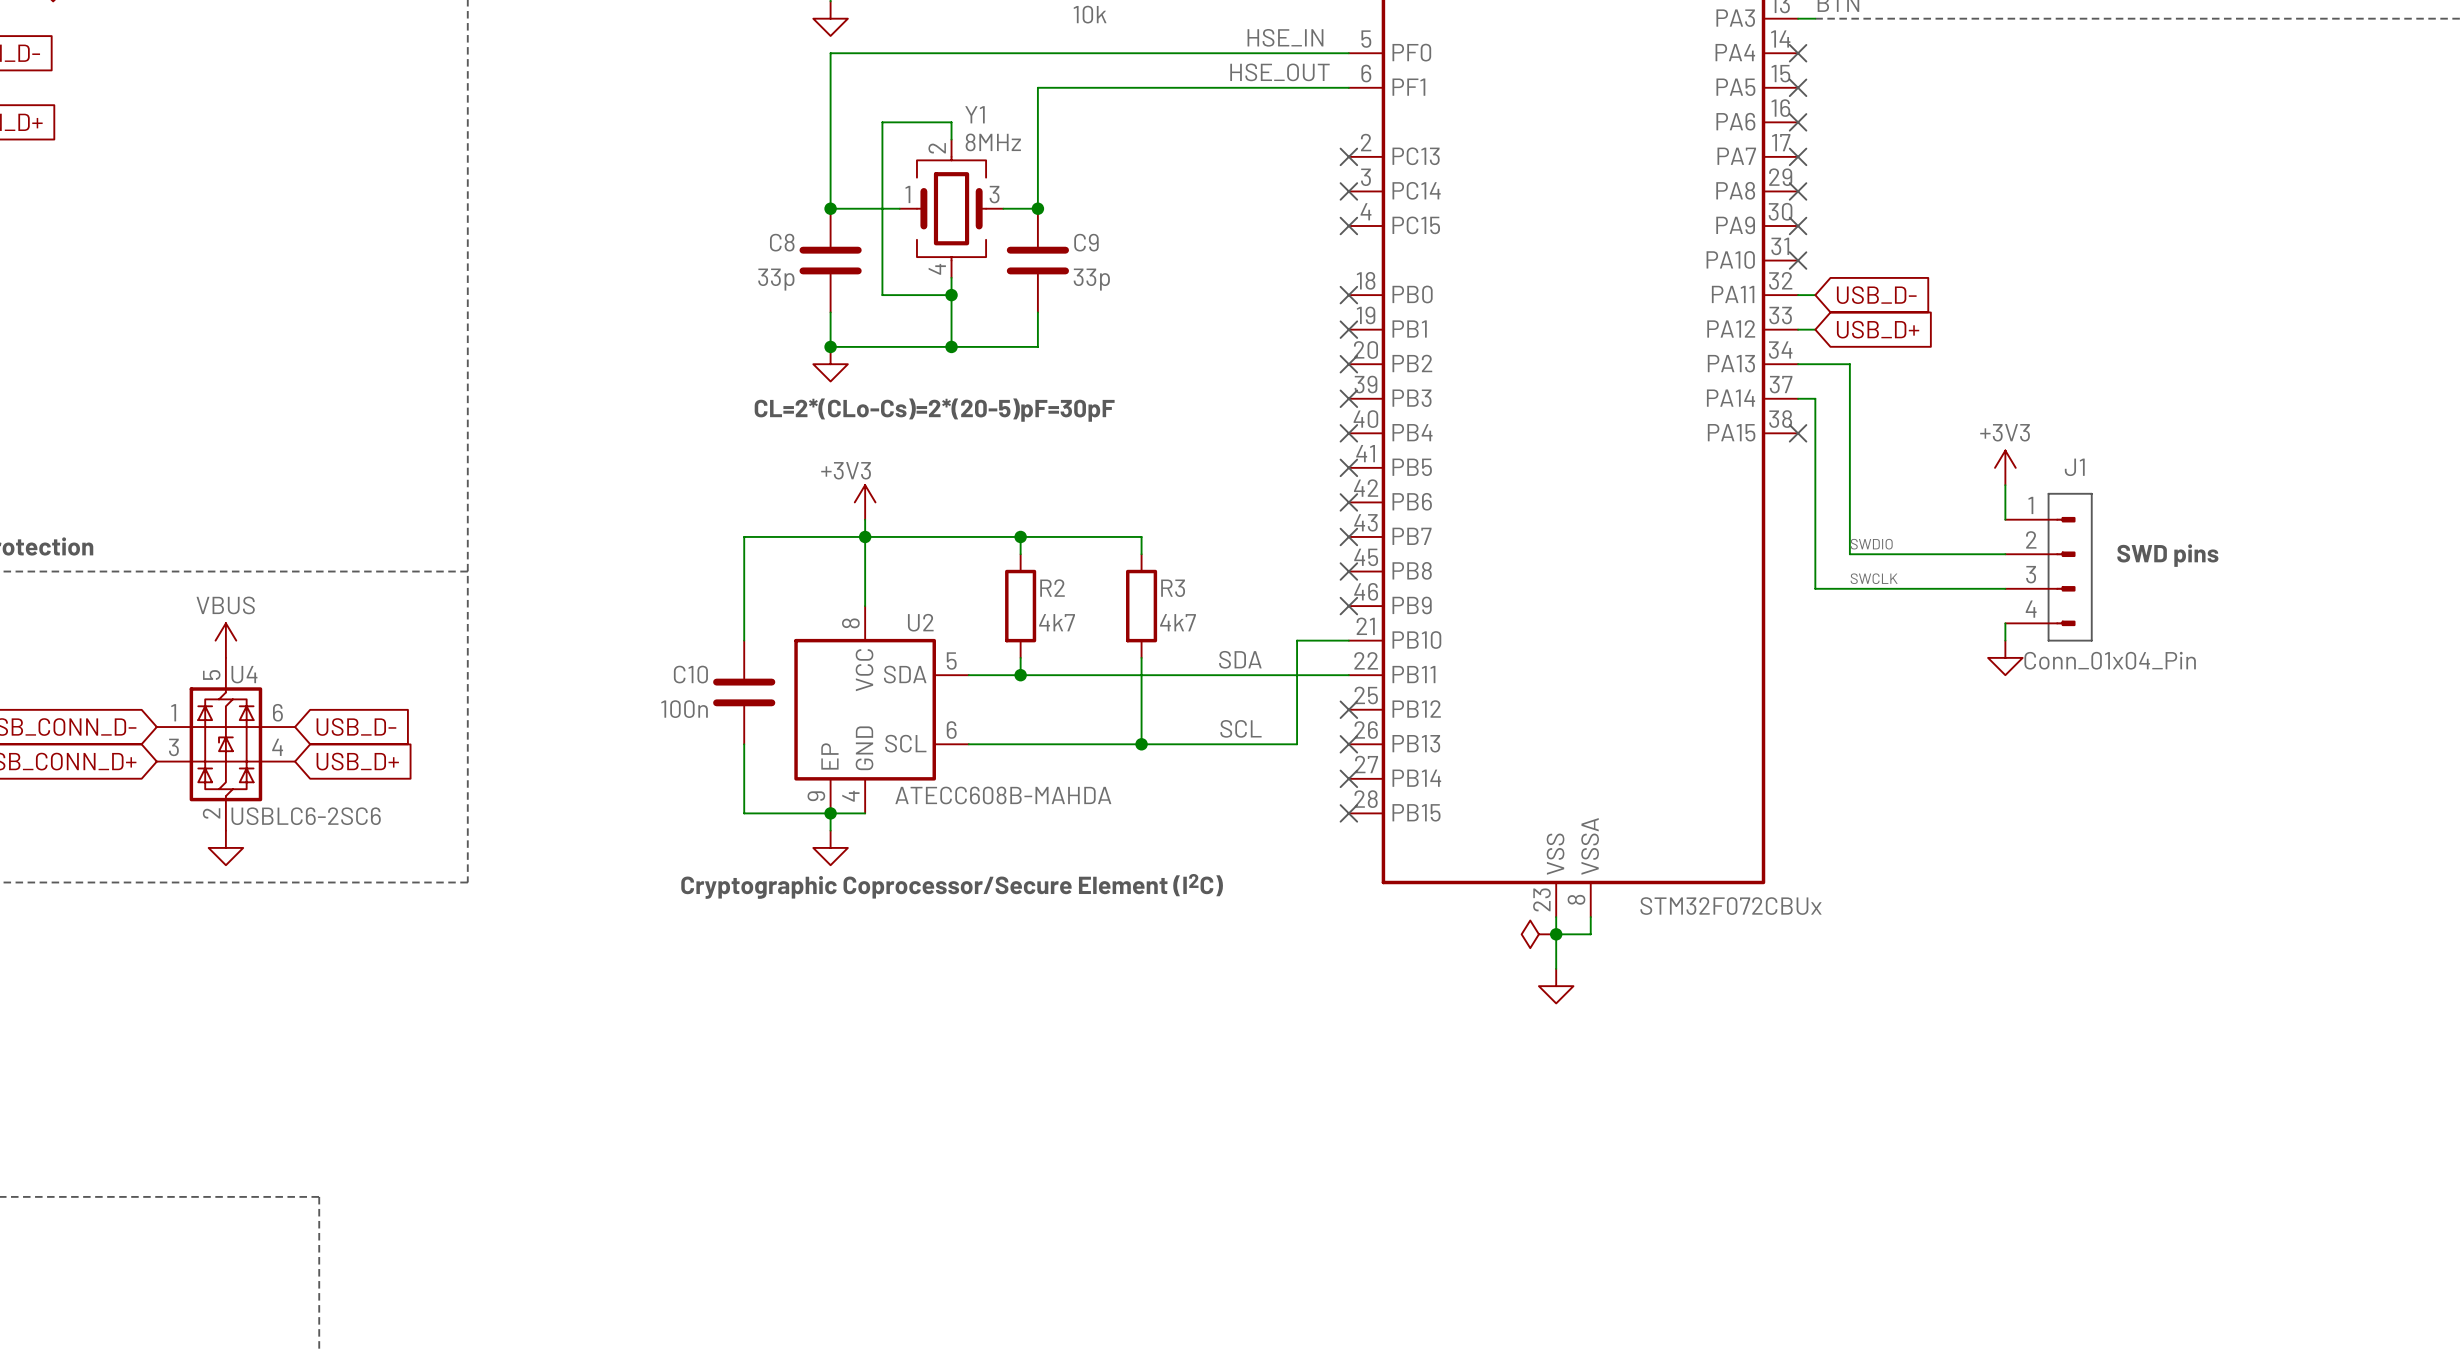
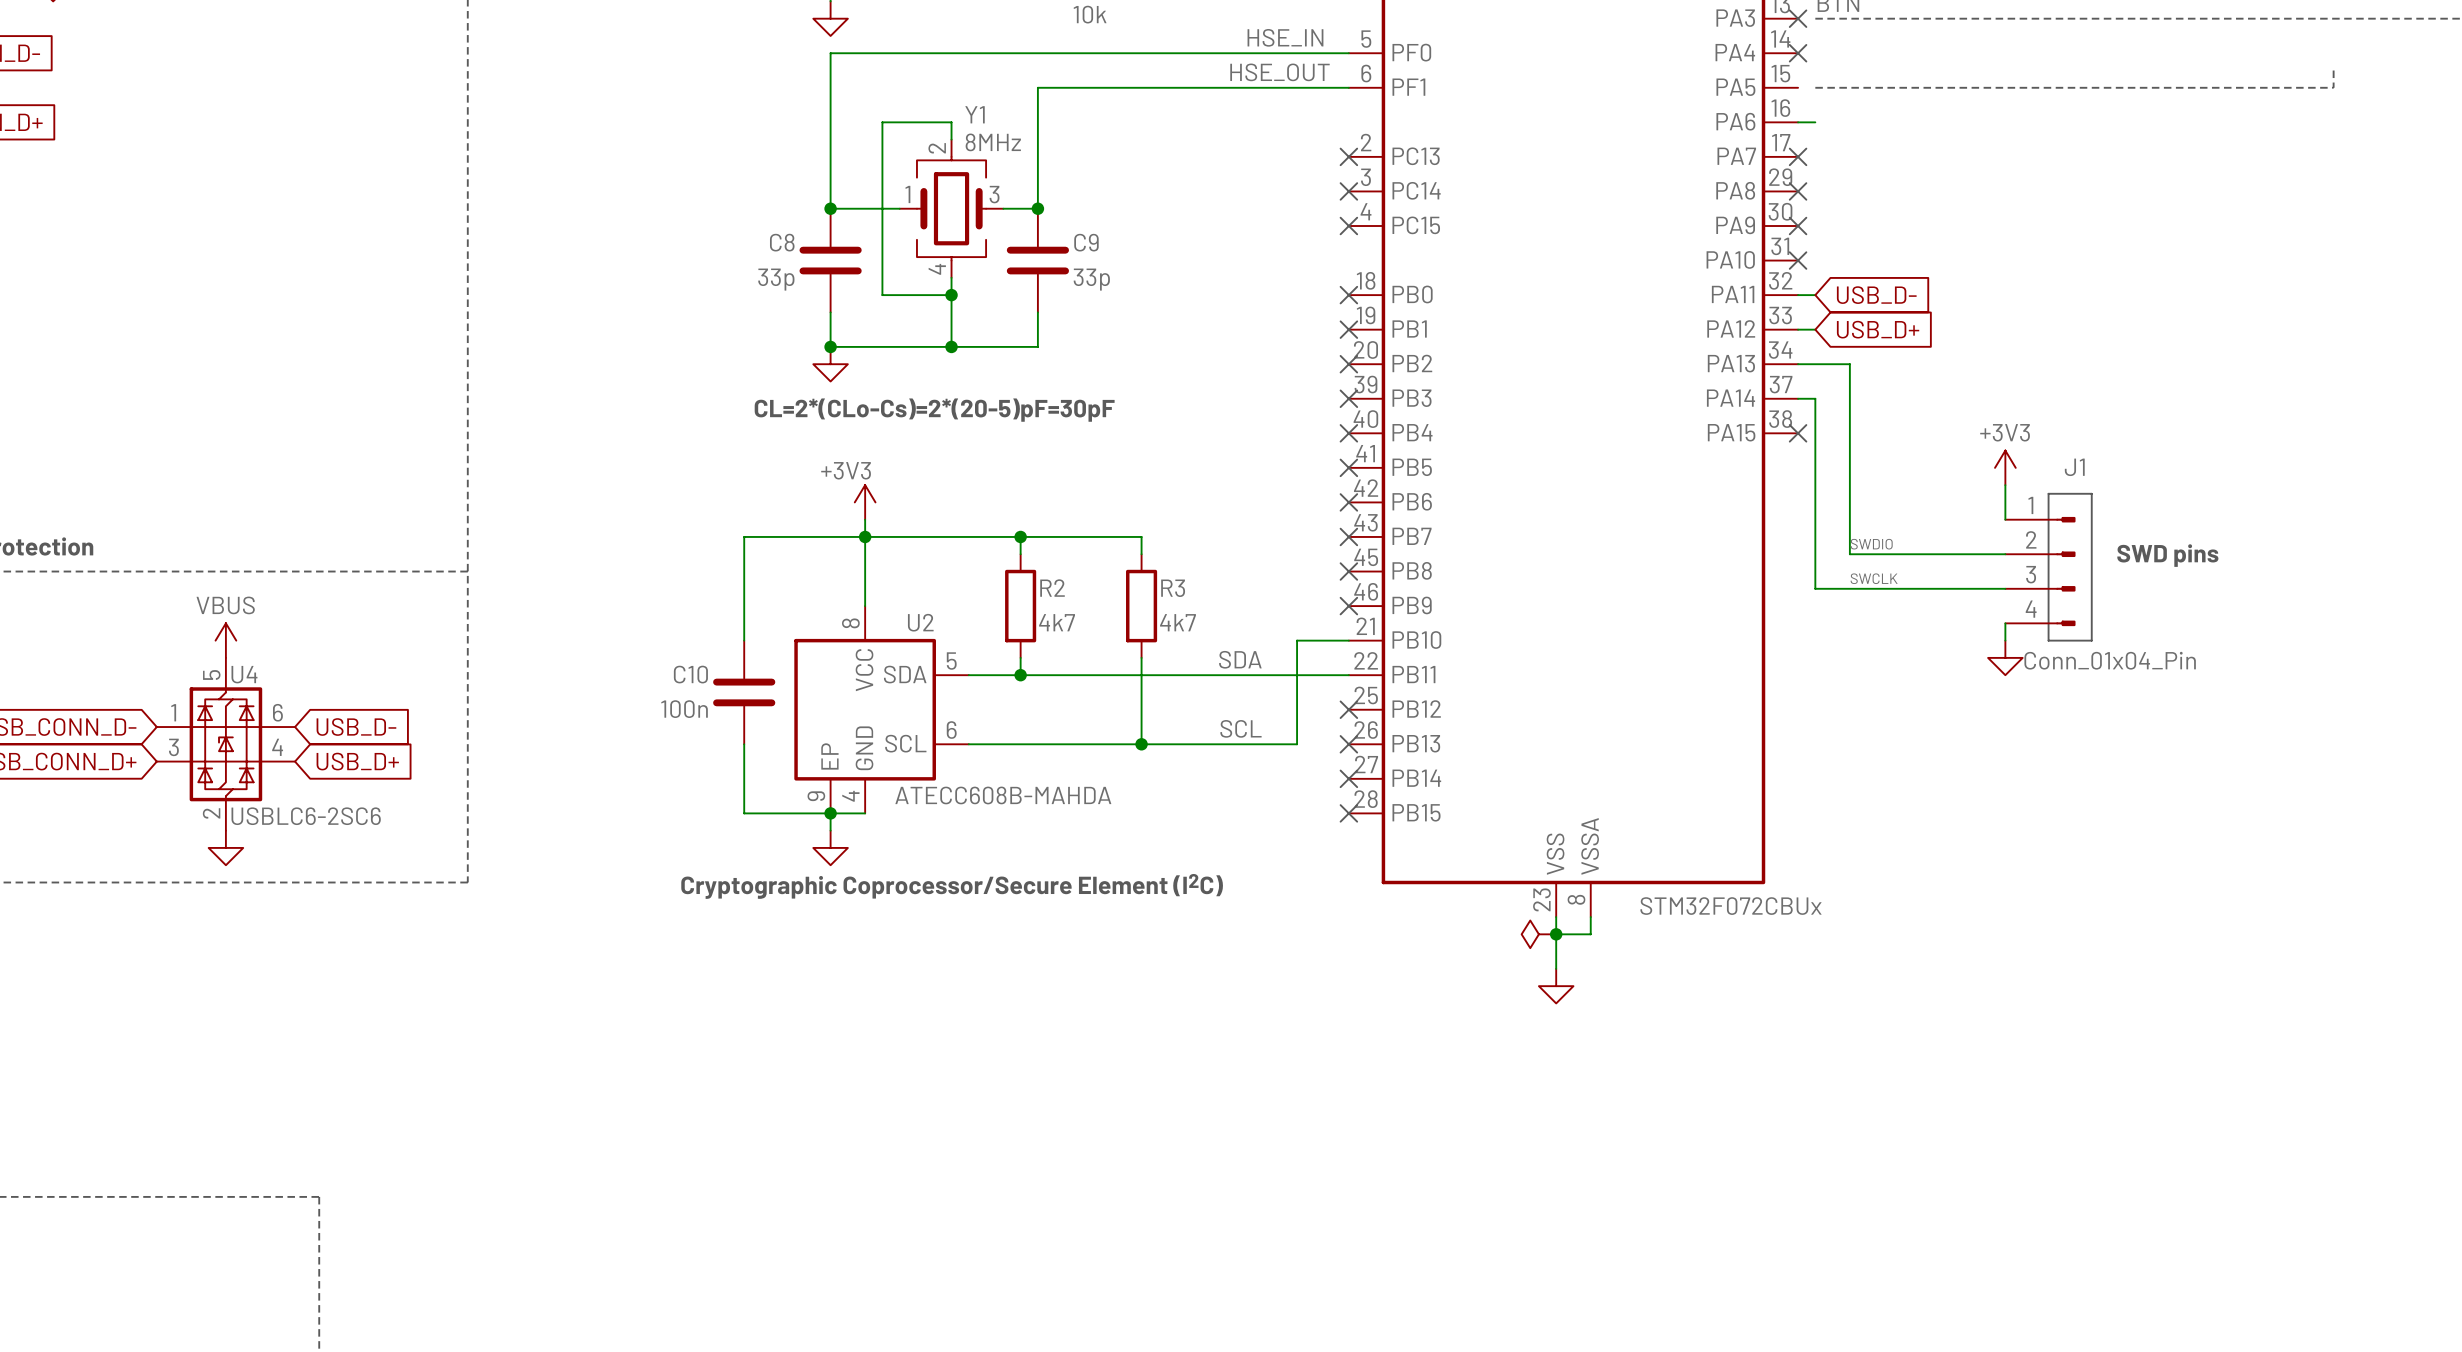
wire: (1798, 18) (1815, 18) -> (1798, 122) (1815, 122)
no-connect mark: none -> (1798, 18)
line: none -> (2333, 70) (2333, 87) (1815, 87)
no-connect mark: (1798, 87) -> none
no-connect mark: (1798, 122) -> none

